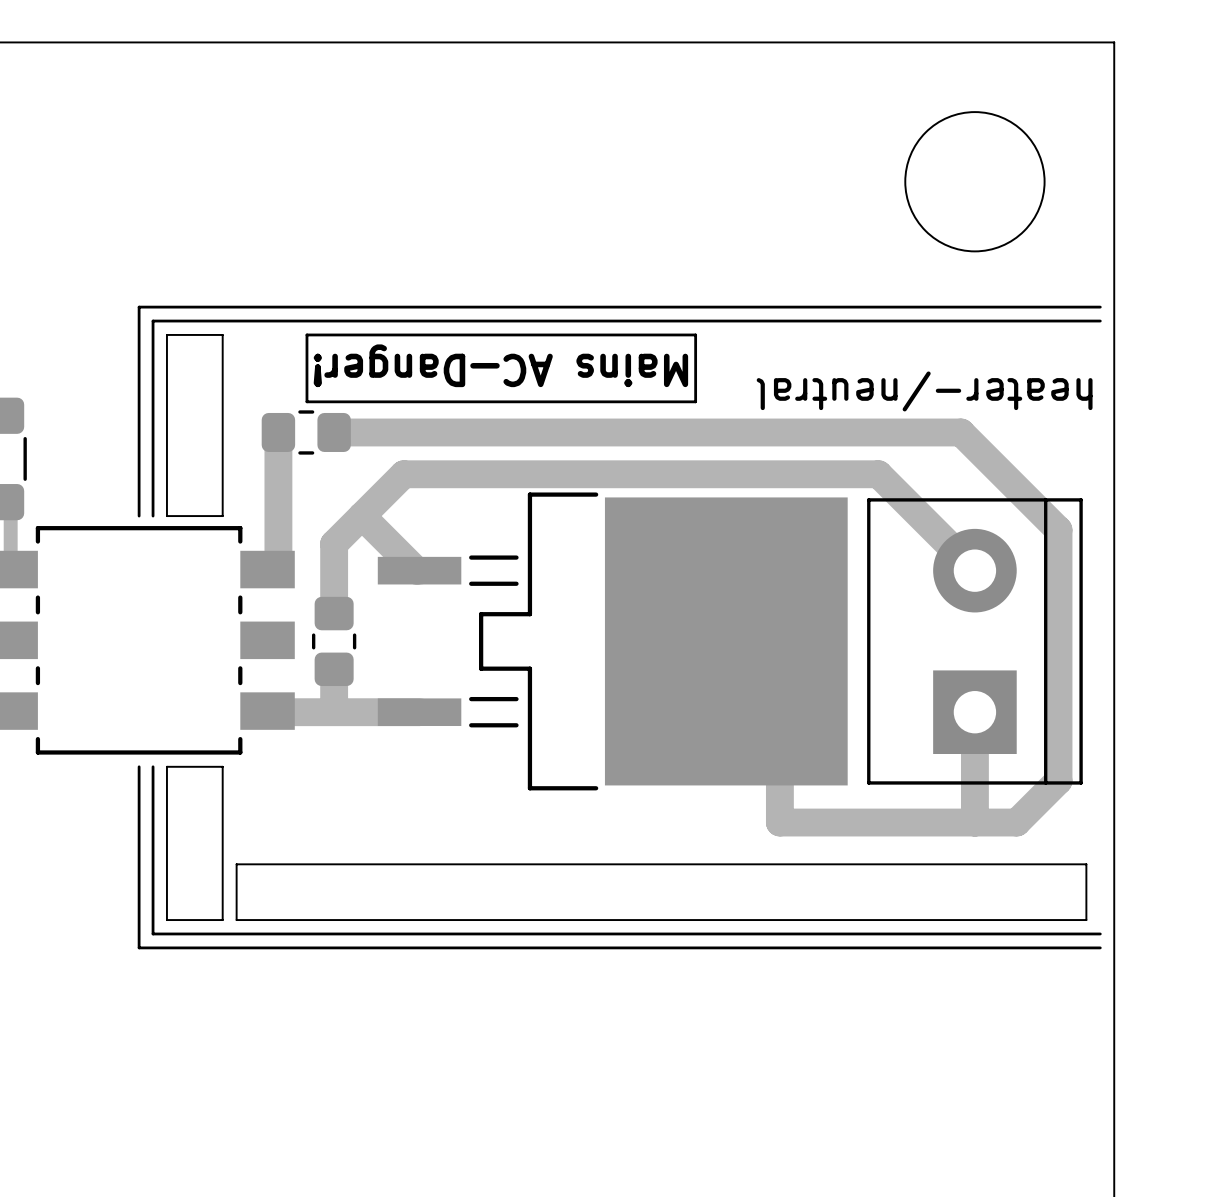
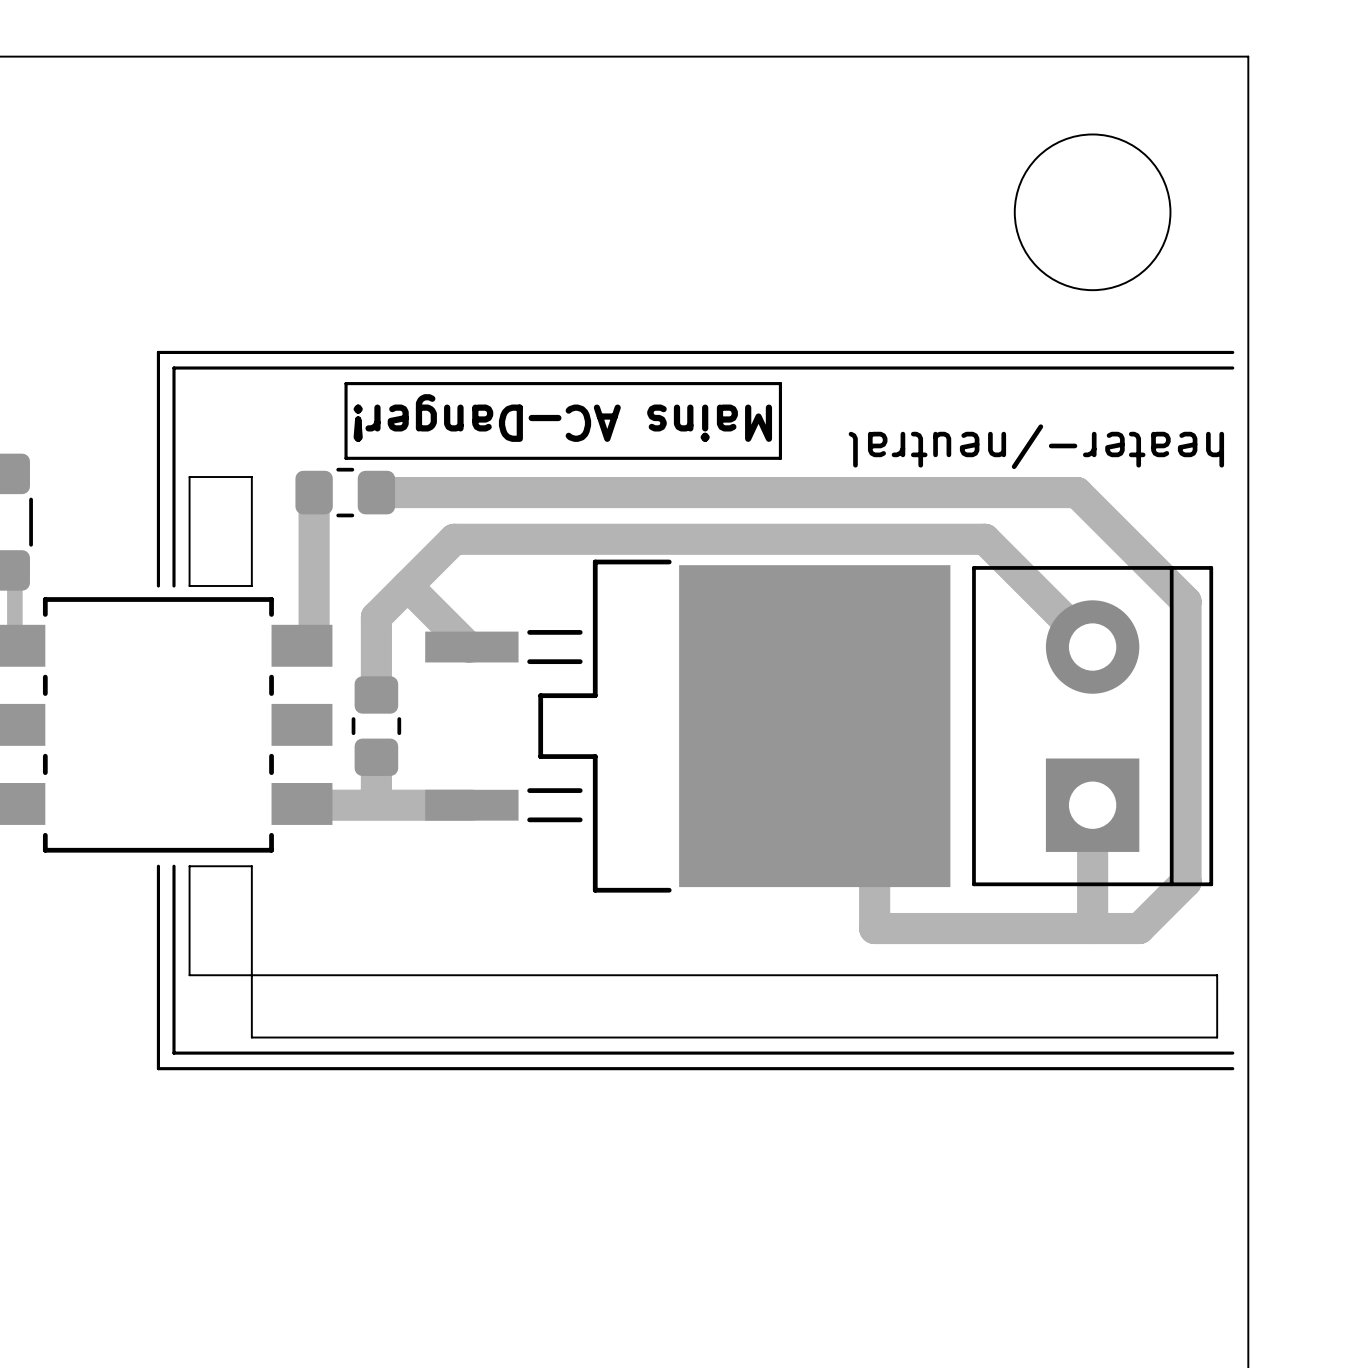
board edge: (166, 418) (166, 334) (222, 334) (222, 418) -> (189, 477) (251, 477)
board edge: (166, 864) (166, 920) (222, 920) -> (189, 975) (267, 975)
board edge: (236, 864) (236, 920) -> (251, 1037) (267, 1037)

